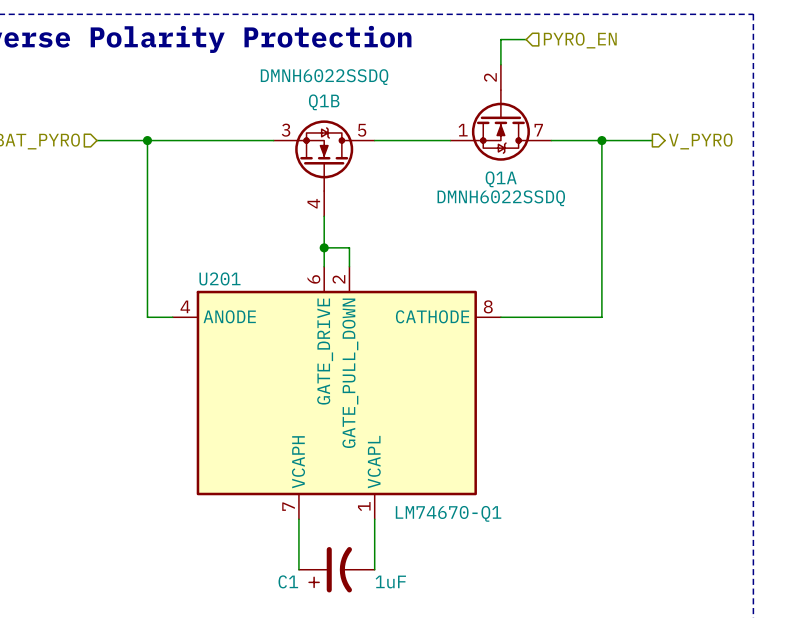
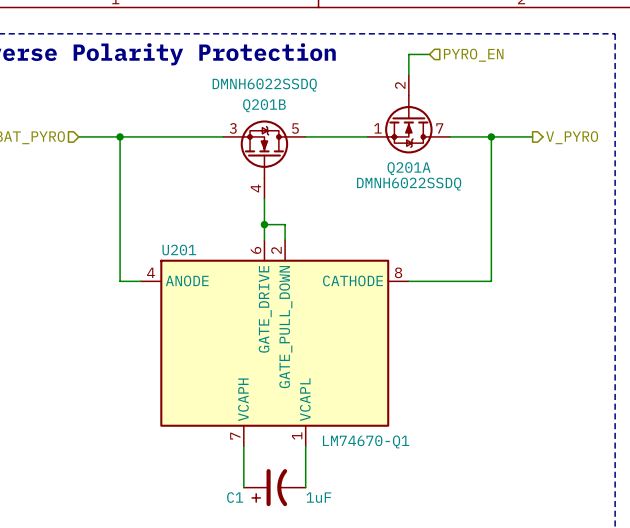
Q1B name: Q1B (324, 102) -> Q201B (264, 105)
Q1A name: Q1A (501, 179) -> Q201A (409, 168)

